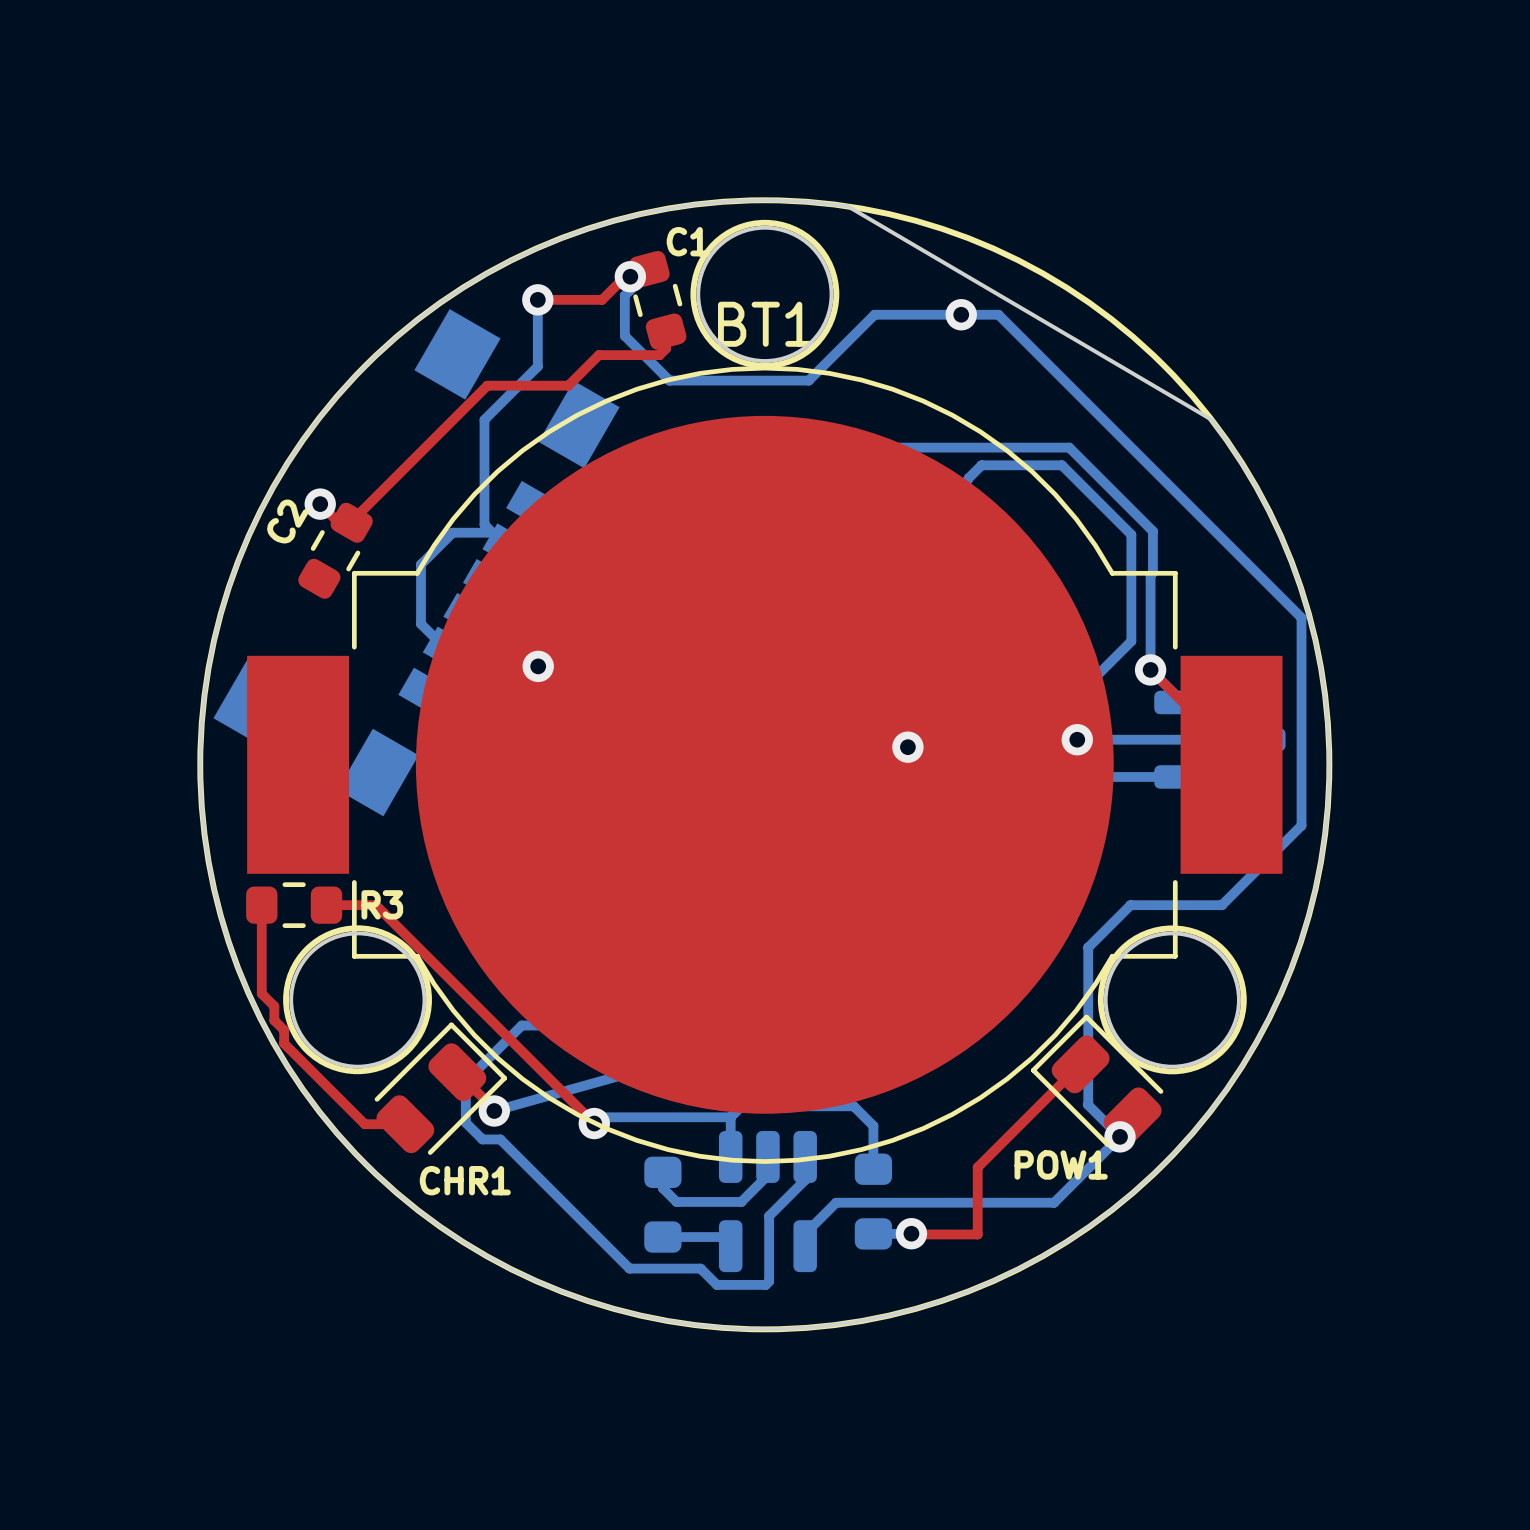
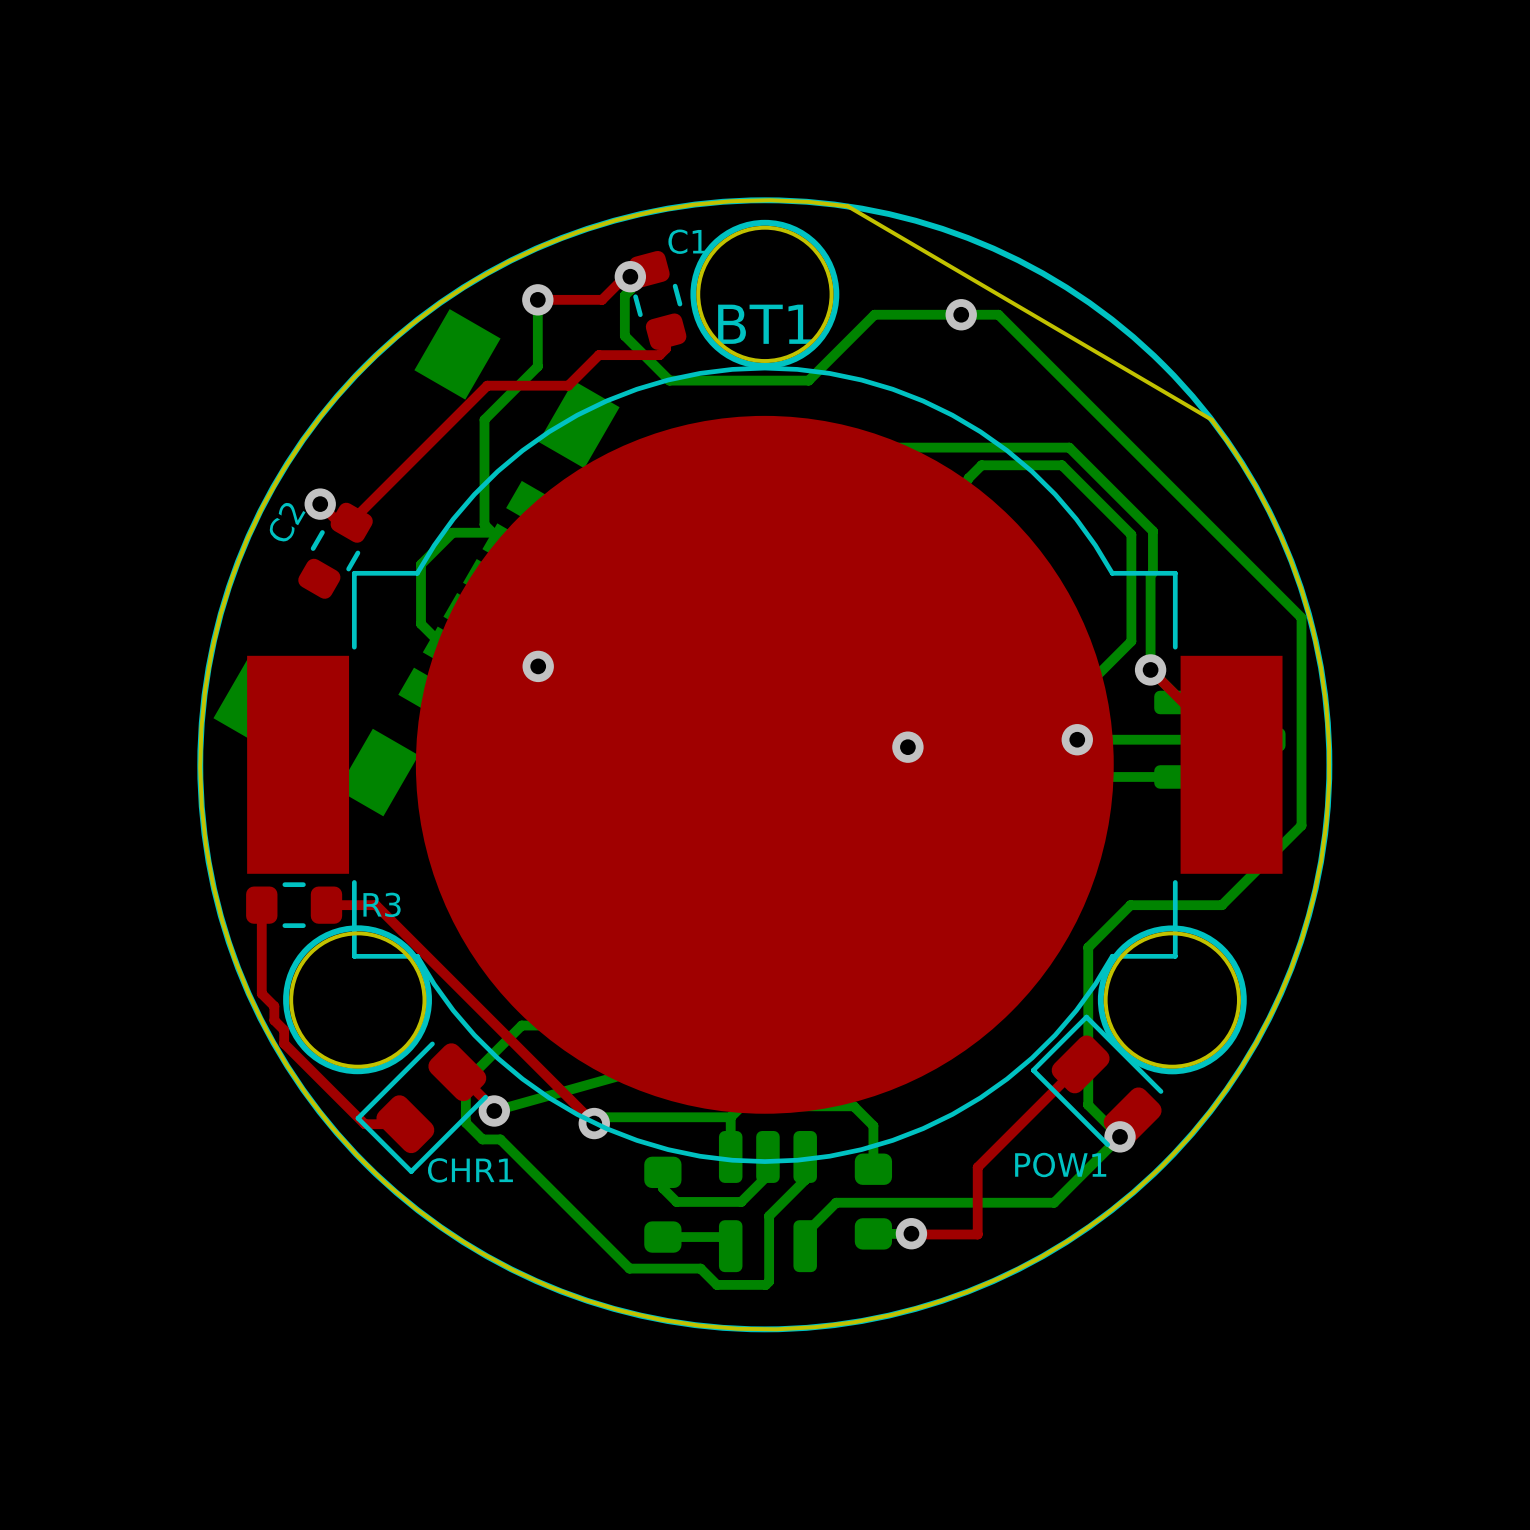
CHR1 rotation: 0° (440, 1088) -> 180° (421, 1107)

